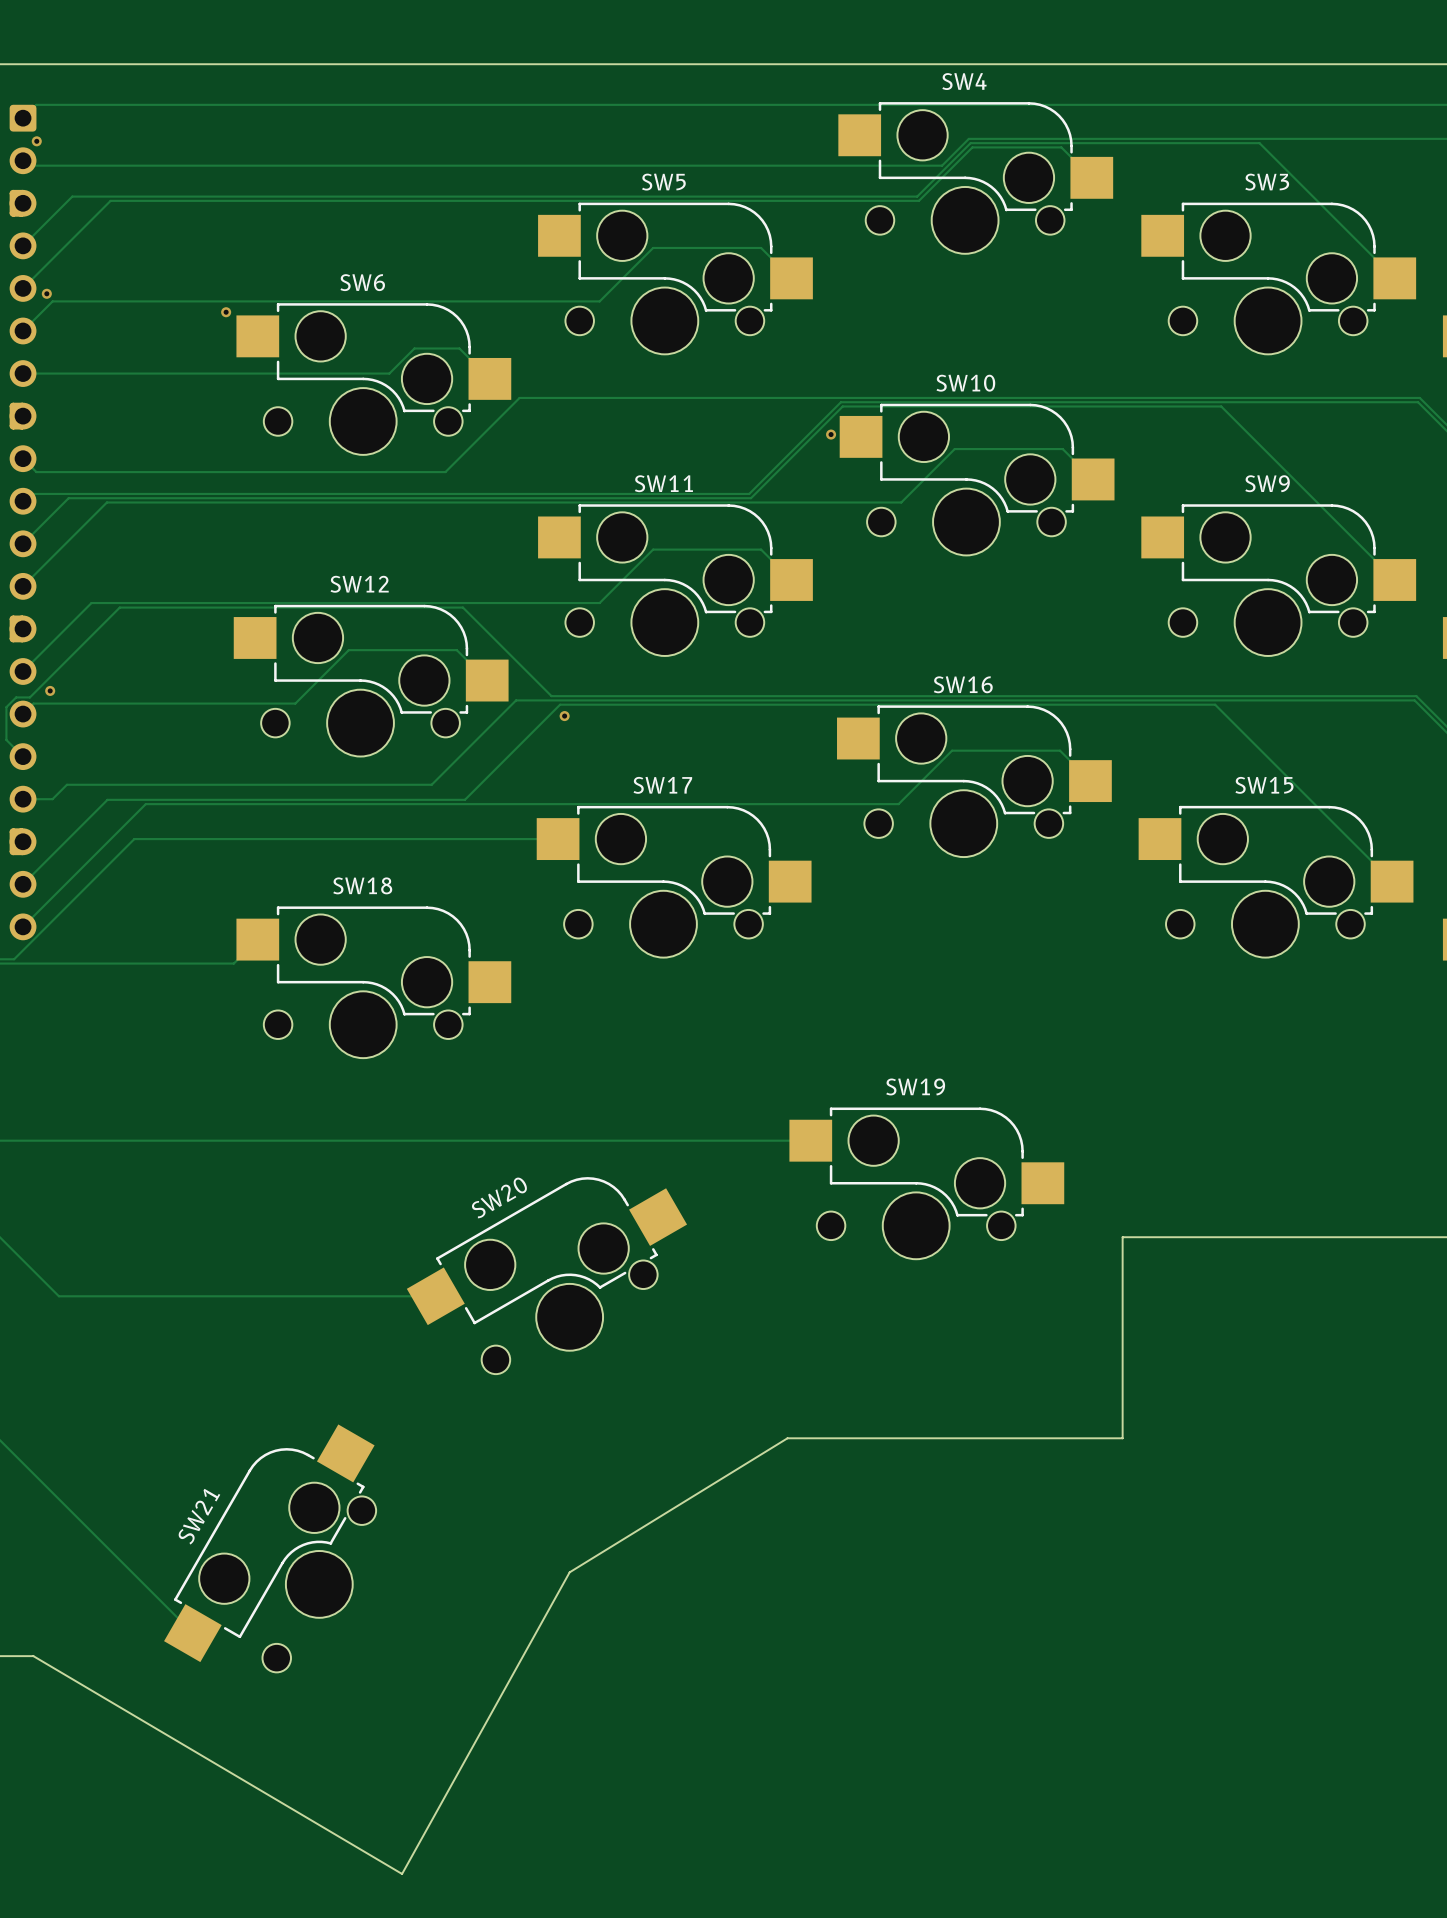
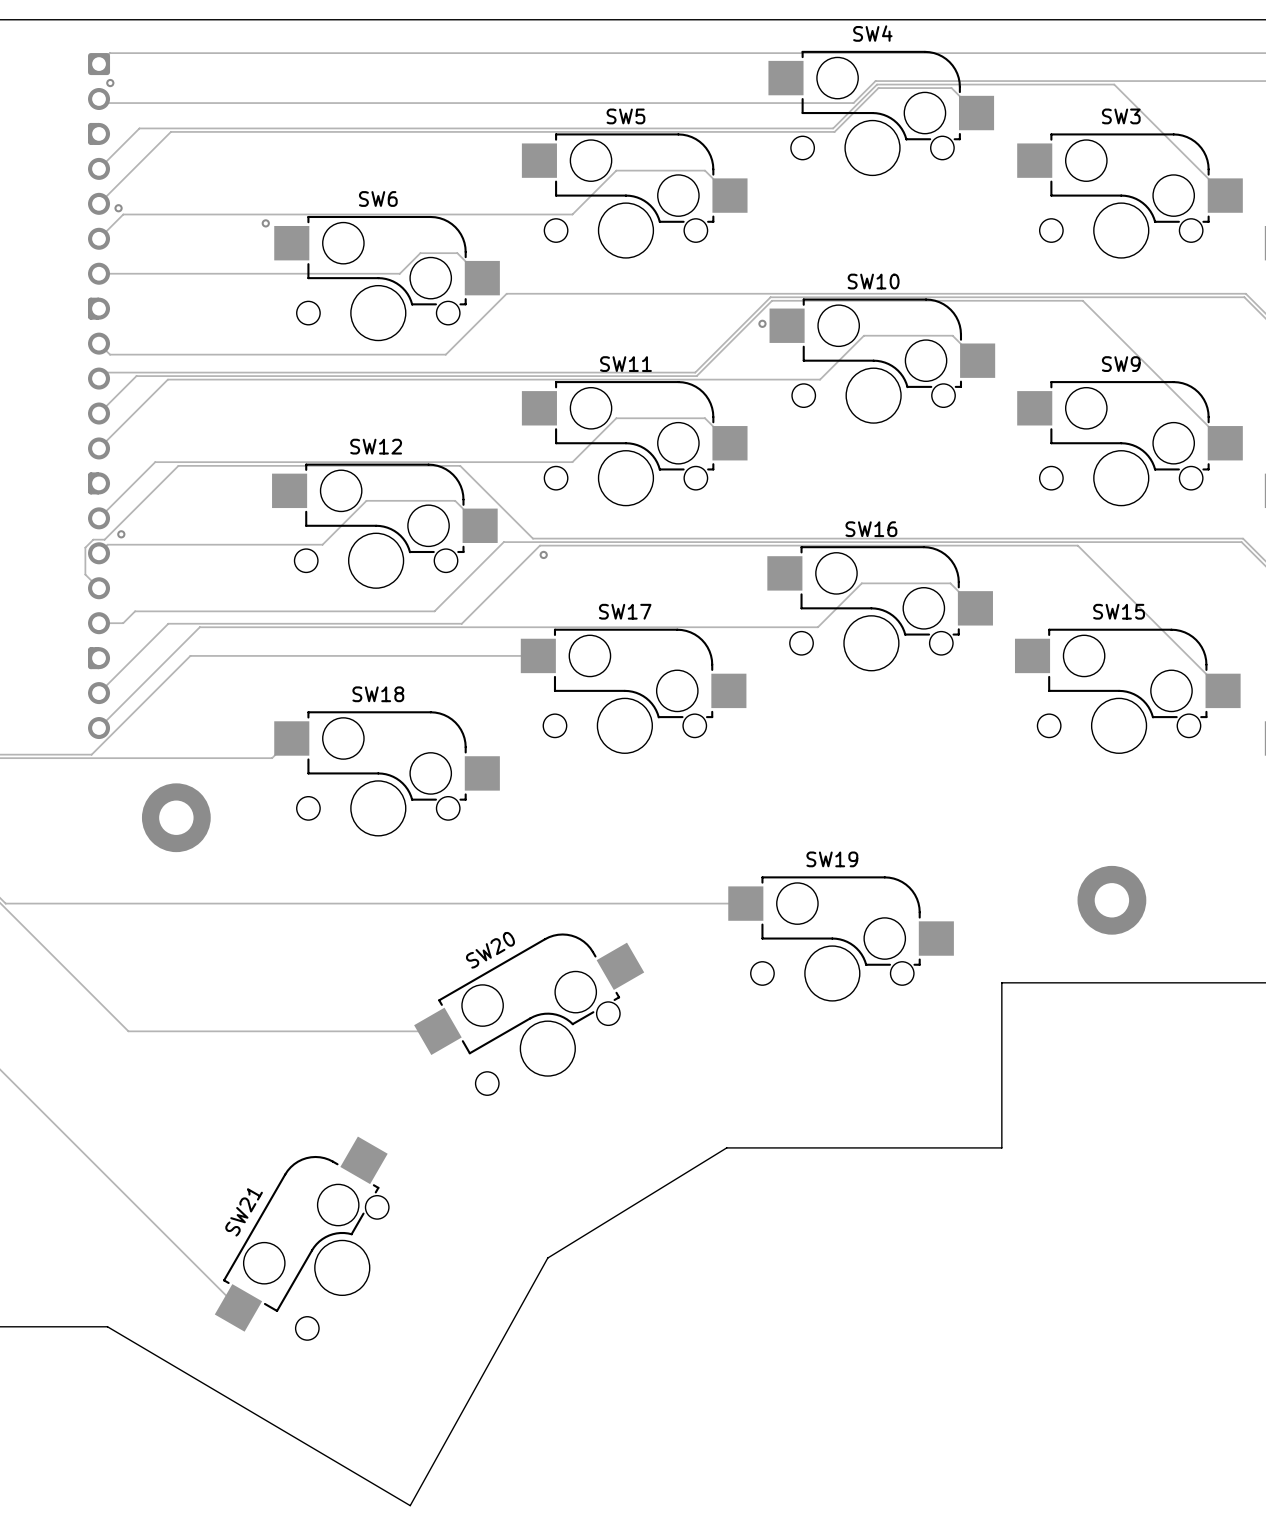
part: none -> (176, 817)
part: none -> (1111, 900)

